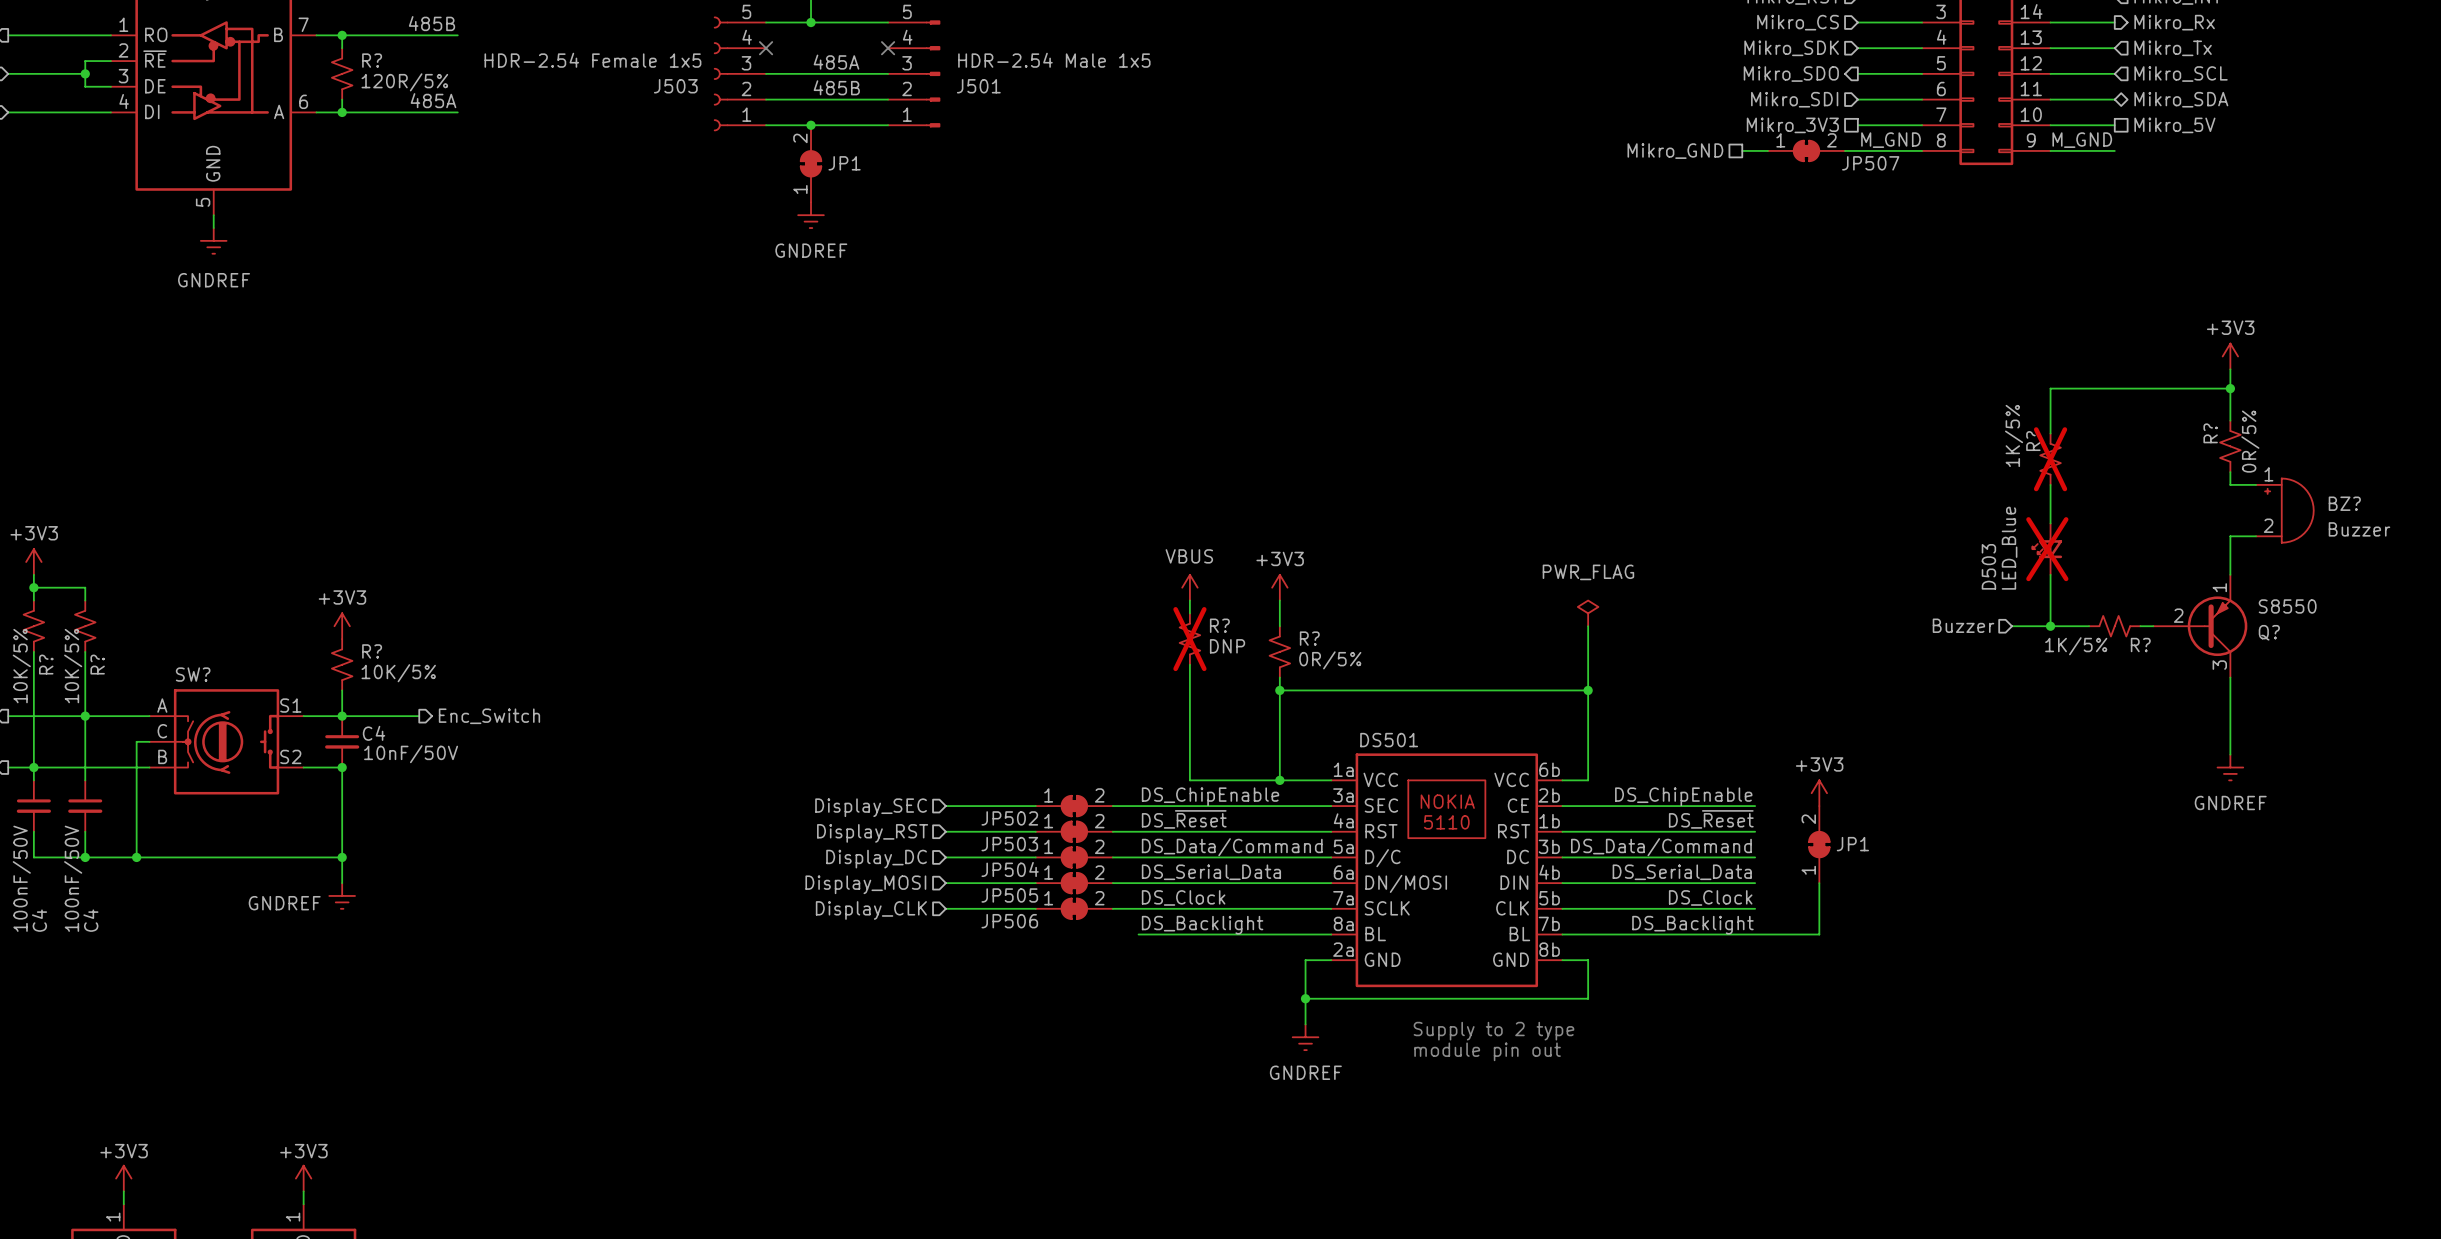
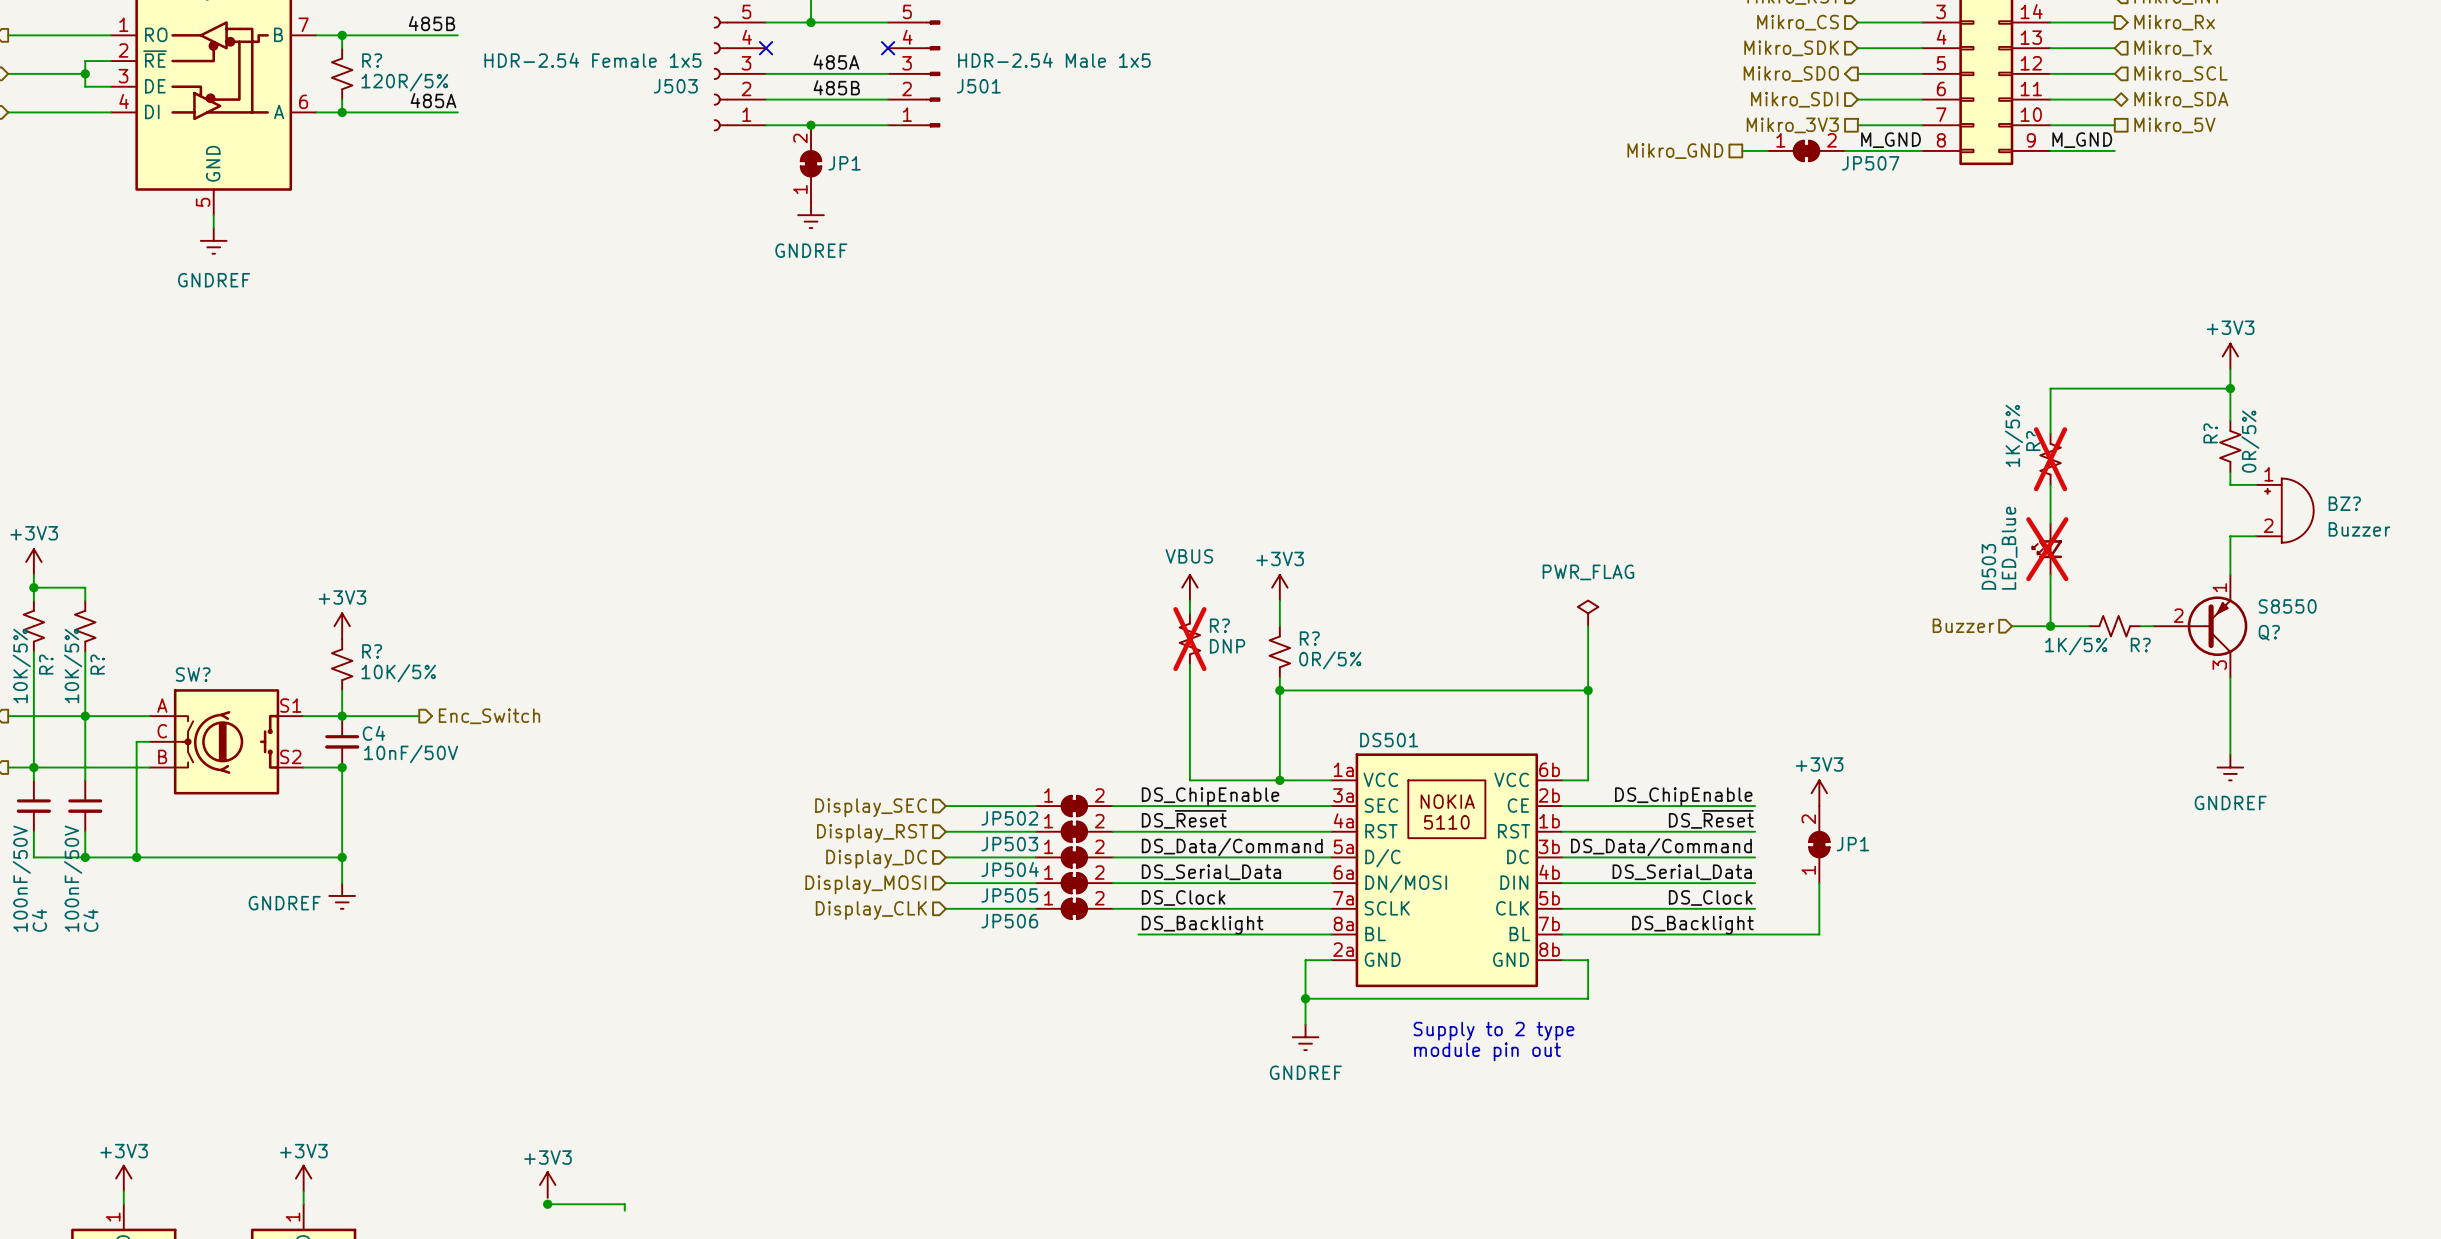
power symbol: none -> +3V3 (547, 1184)
wire: none -> (547, 1204) (624, 1204) (624, 1210)
junction: none -> (547, 1204)

